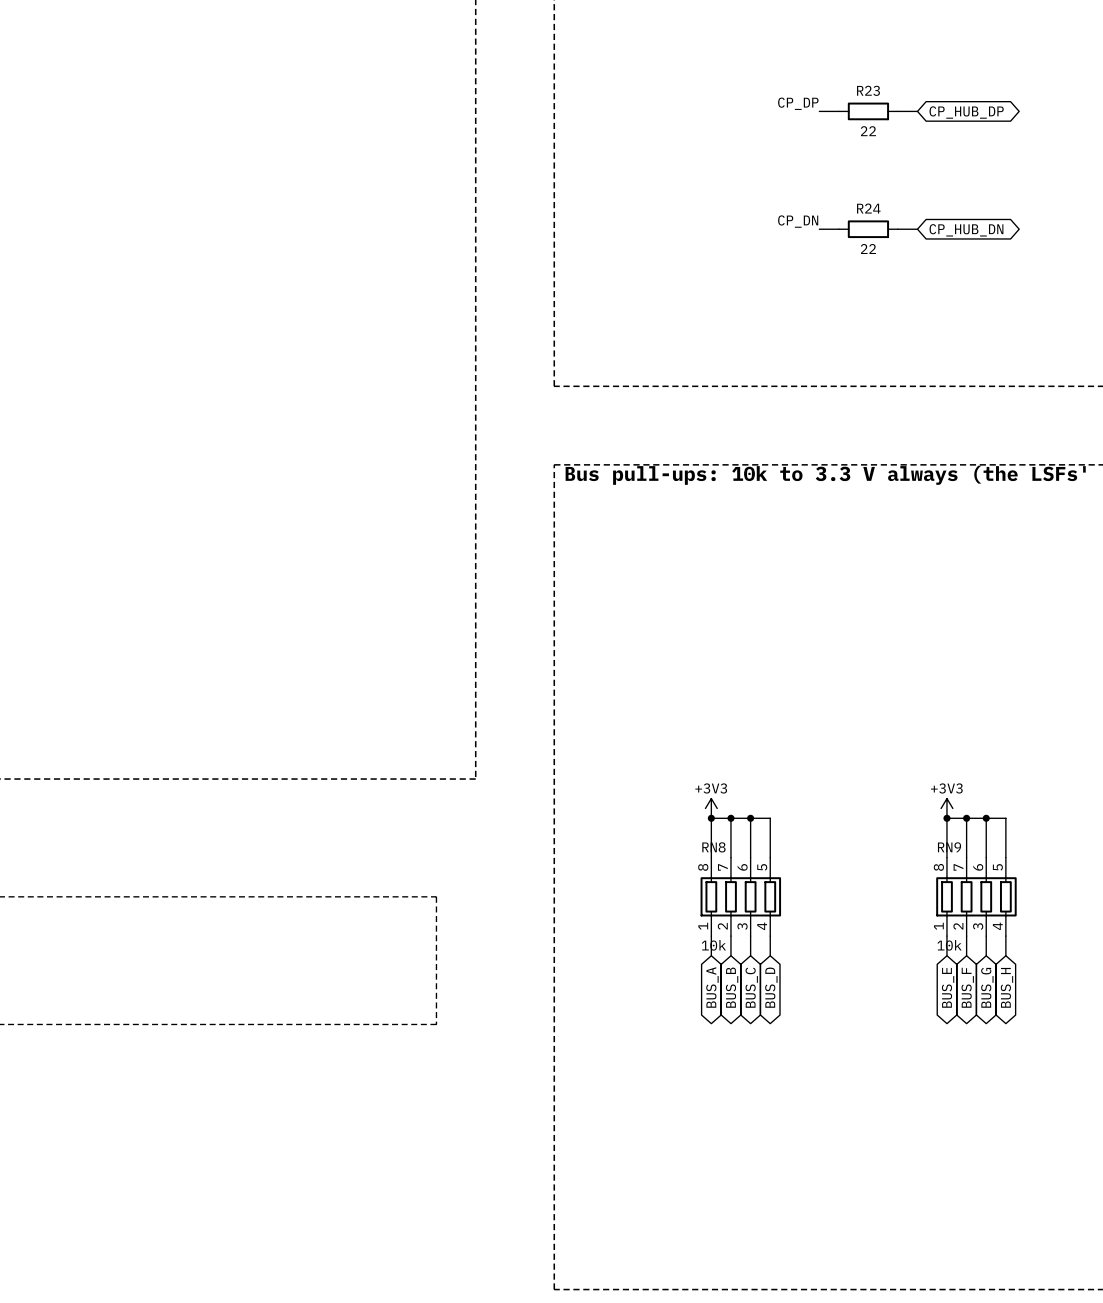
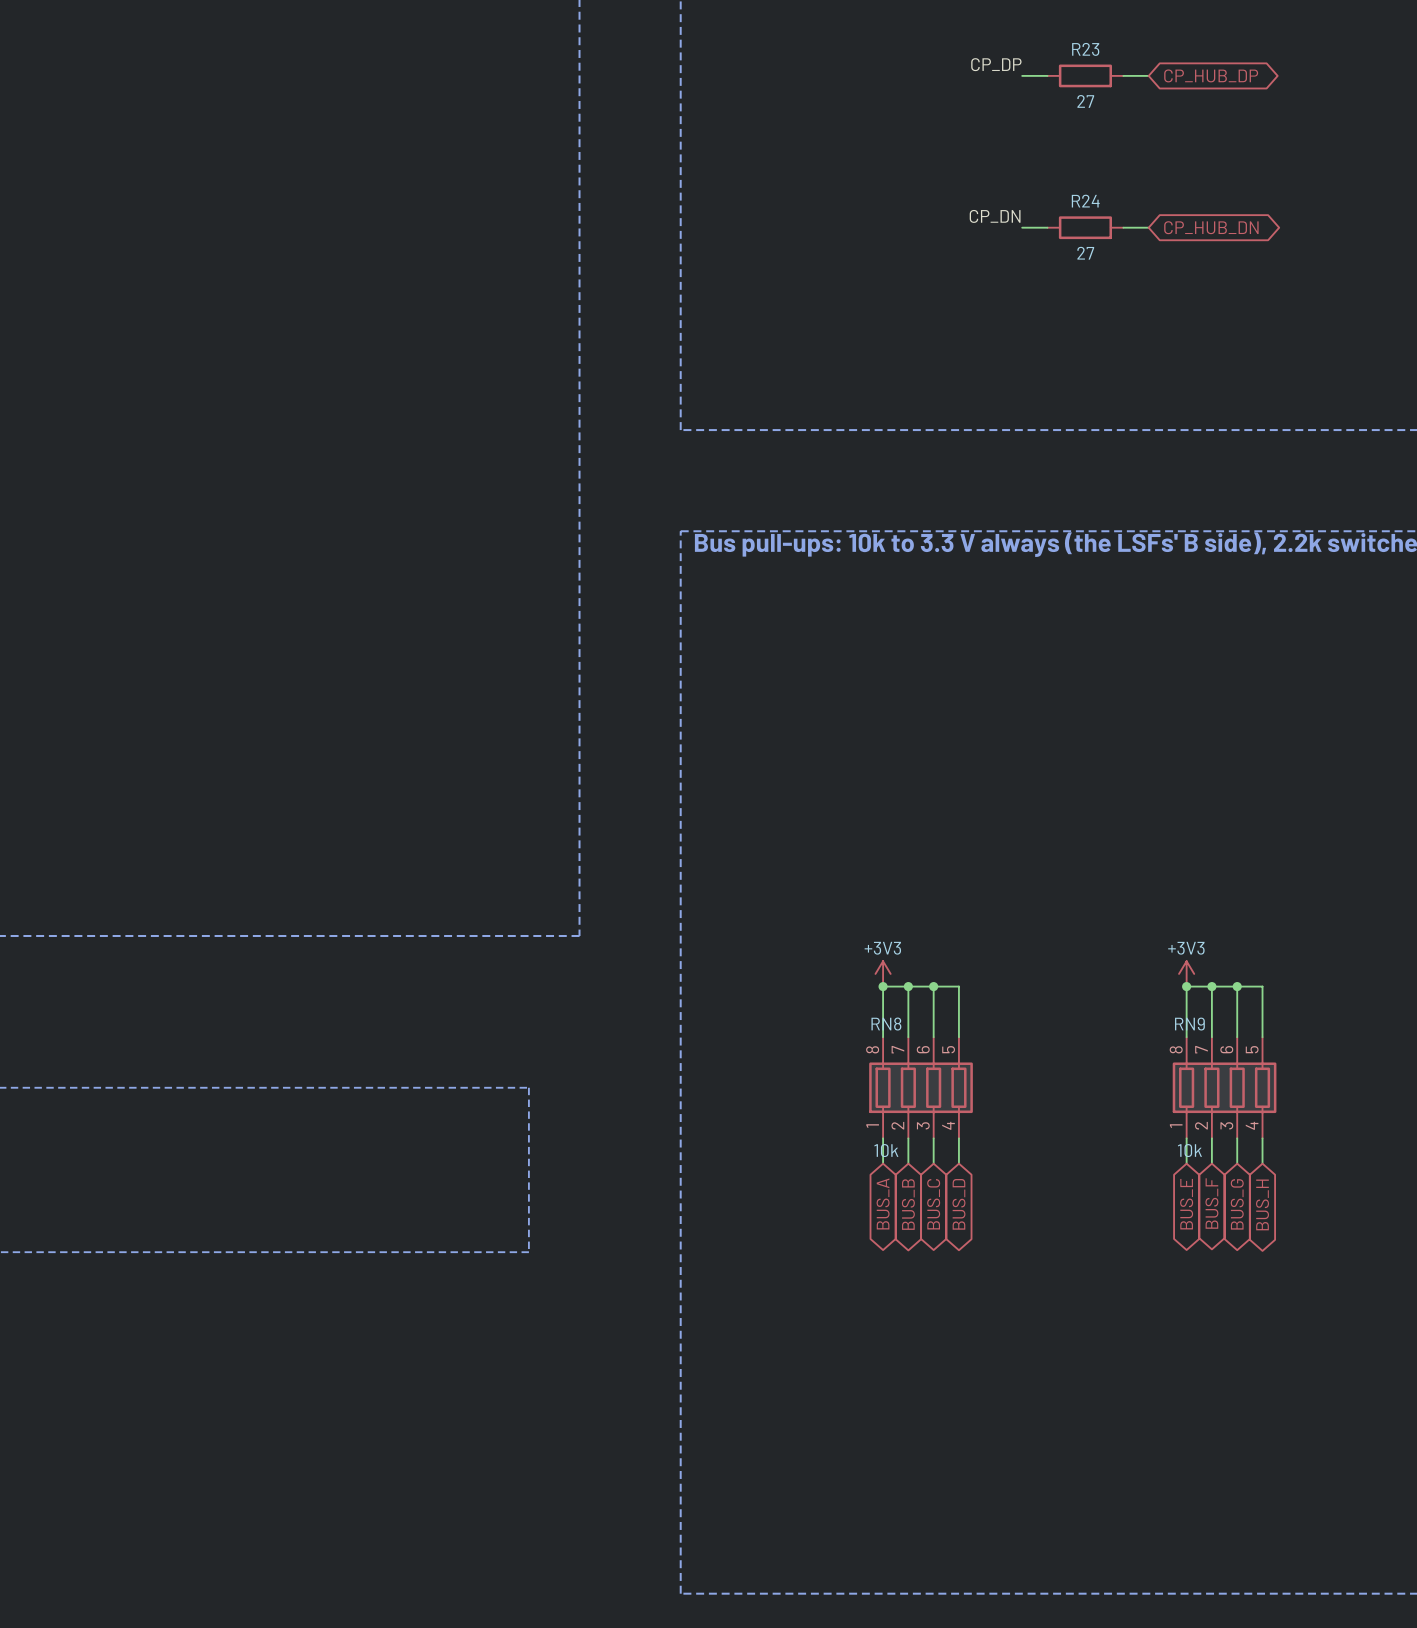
R23 value: 22 (868, 131) -> 27 (1085, 101)
R24 value: 22 (868, 249) -> 27 (1085, 253)

